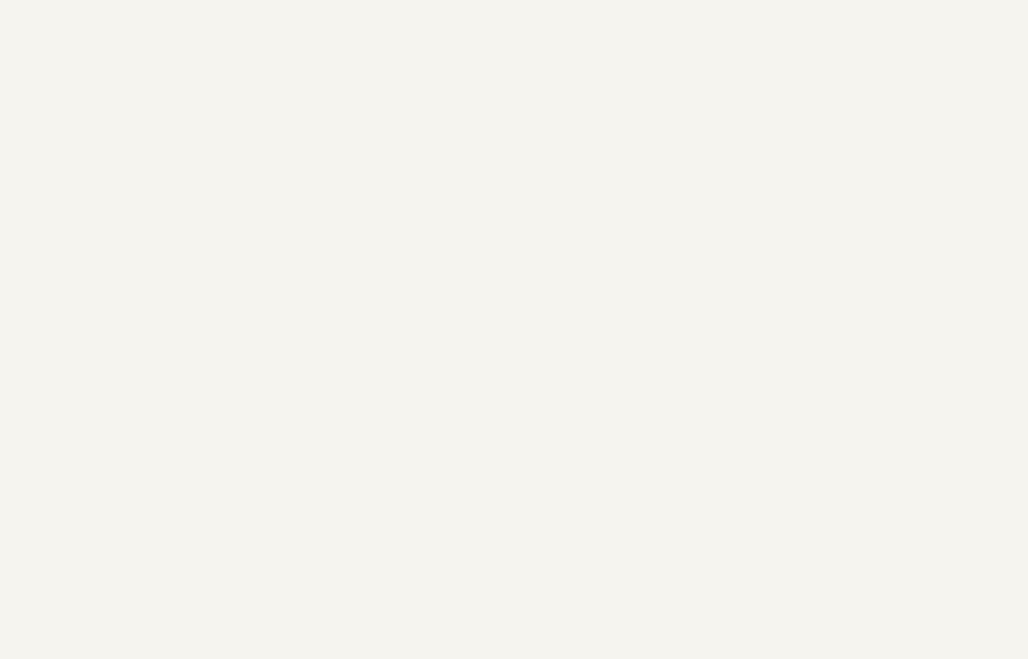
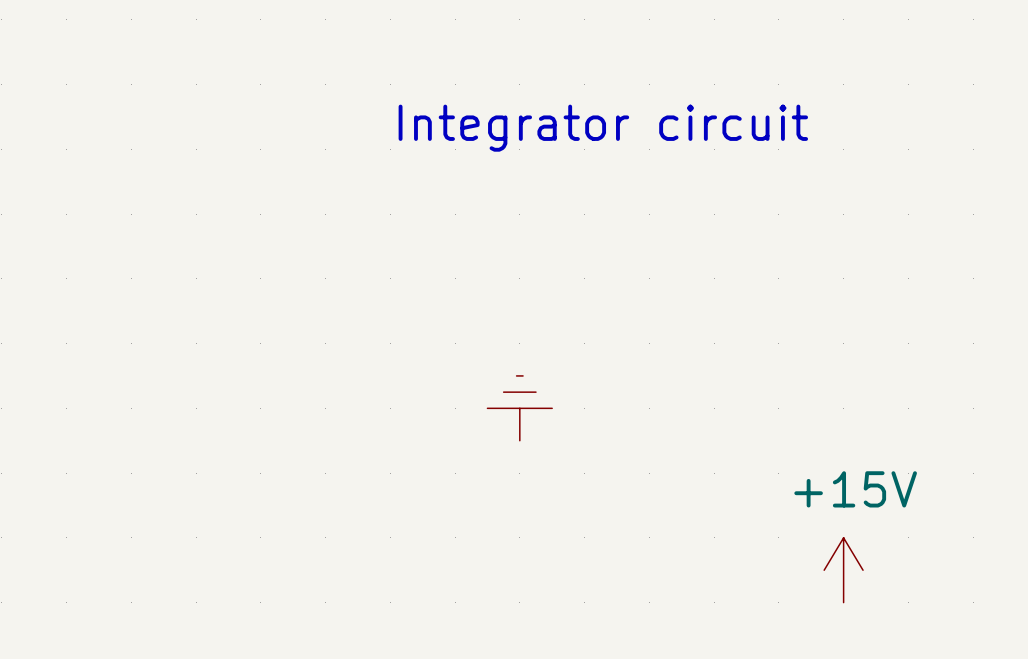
text: none -> Integrator circuit (603, 128)
power symbol: none -> (519, 408)
power symbol: none -> +15V (843, 570)

